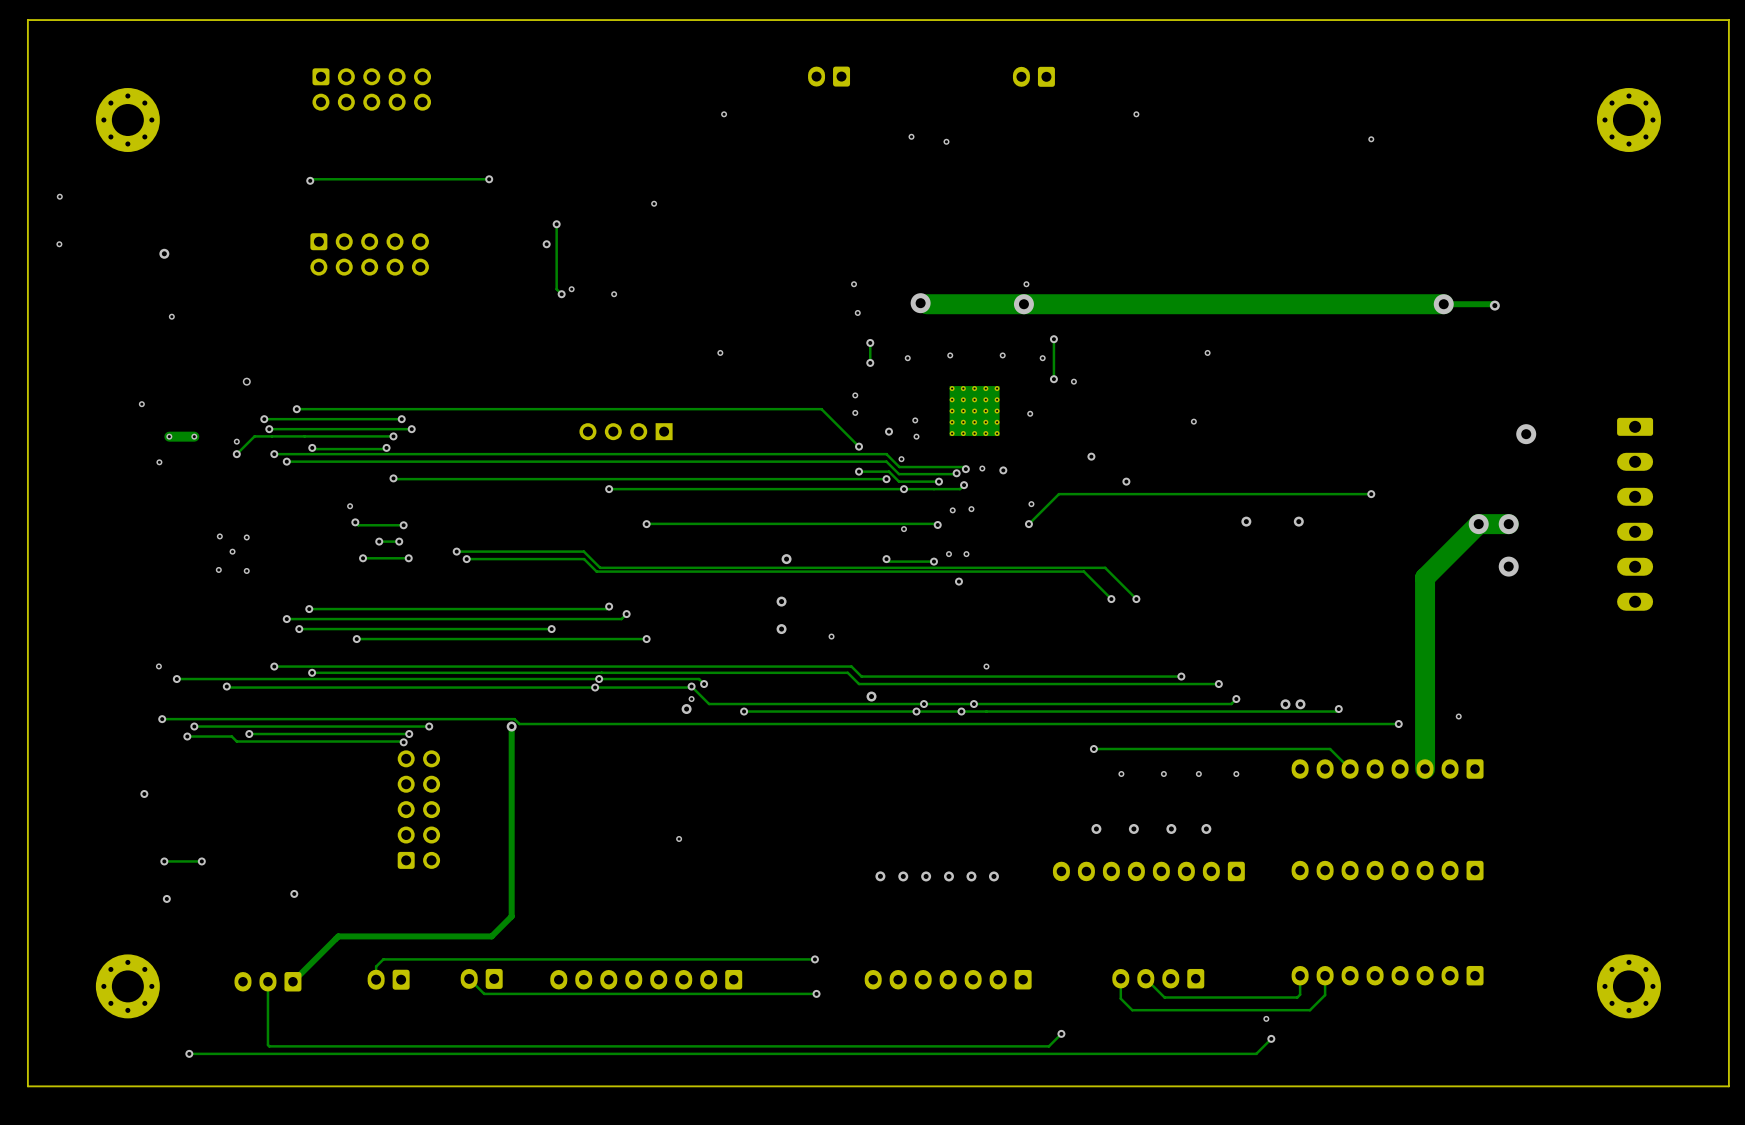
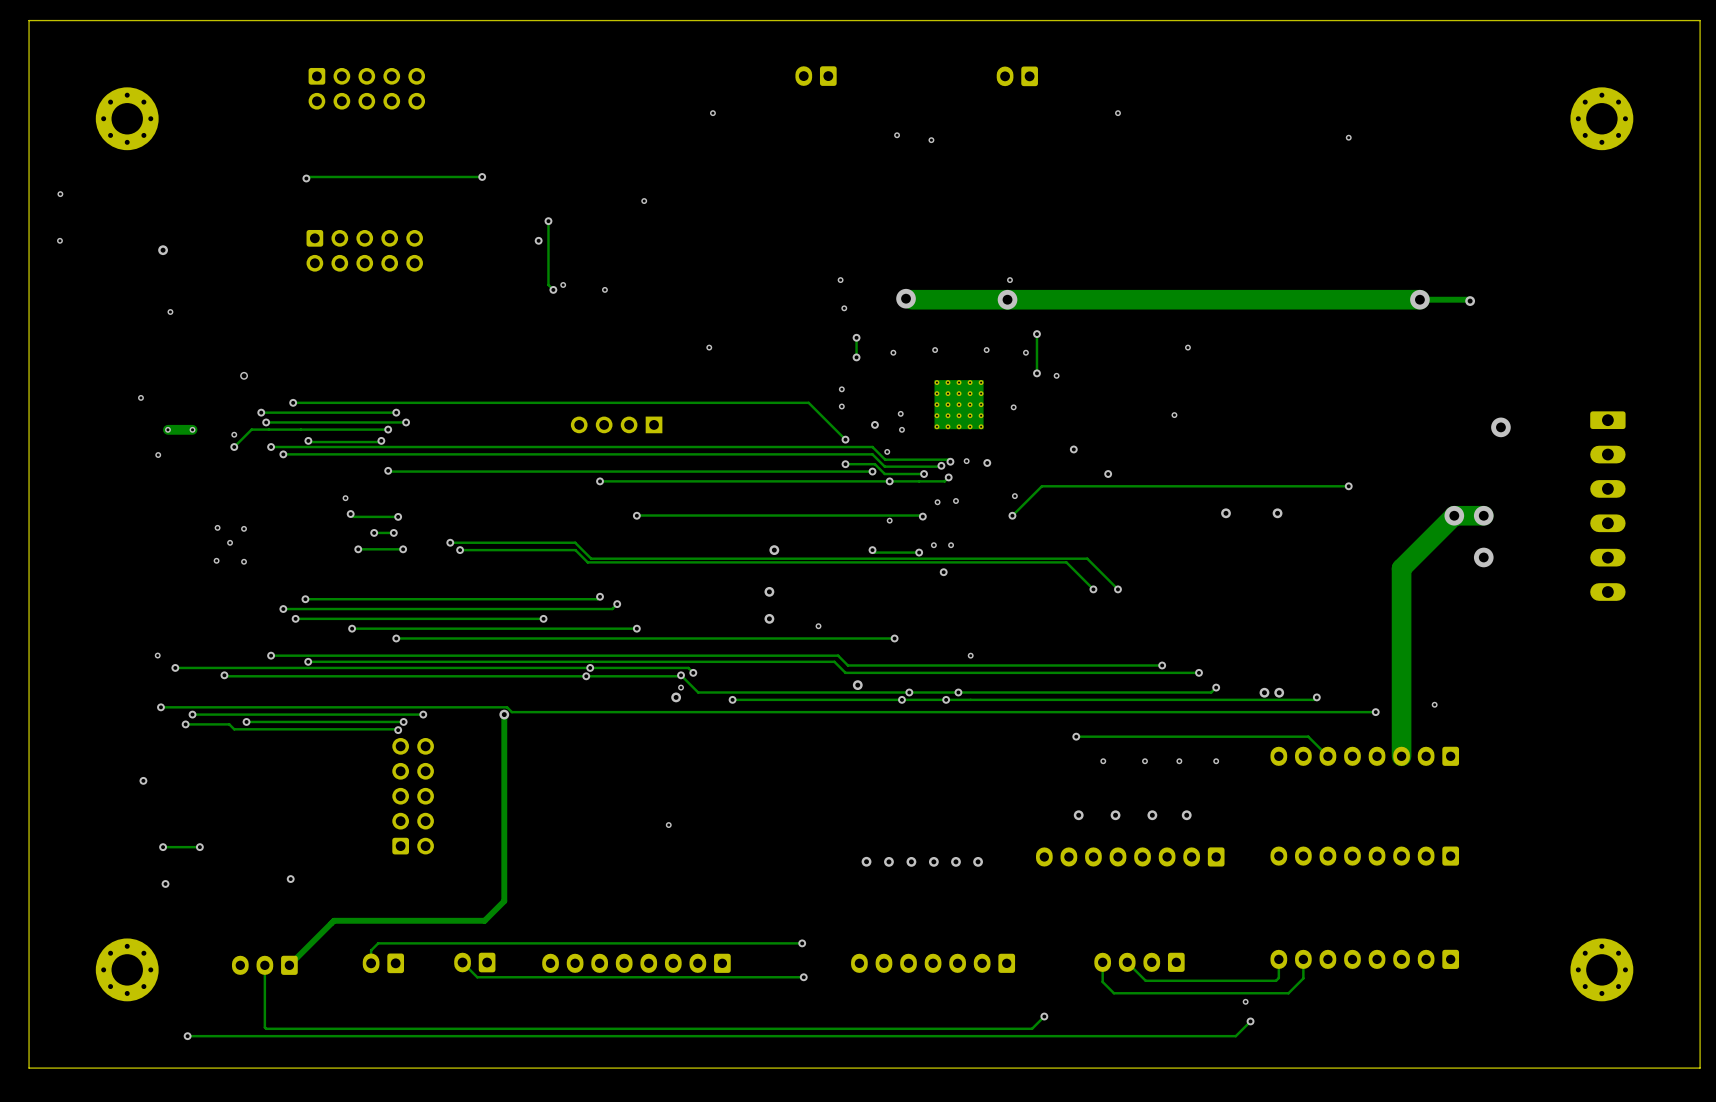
via: none -> (396, 638)
track: none -> (894, 638) (396, 638)
via: none -> (894, 638)

